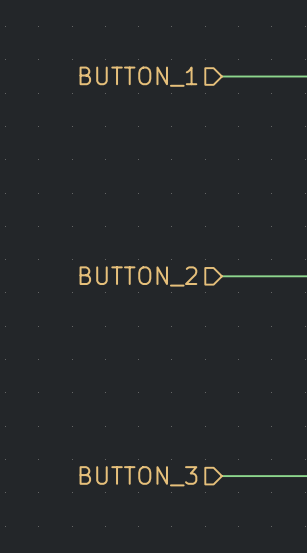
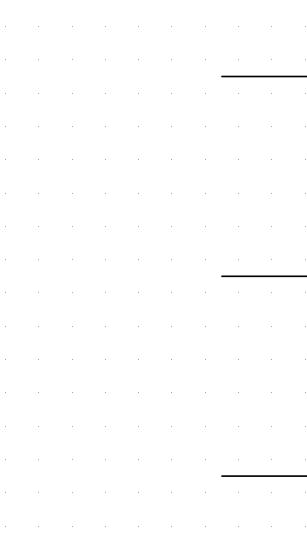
hierarchical label: BUTTON_1 (138, 76) -> none
hierarchical label: BUTTON_2 (138, 276) -> none
hierarchical label: BUTTON_3 (138, 476) -> none

